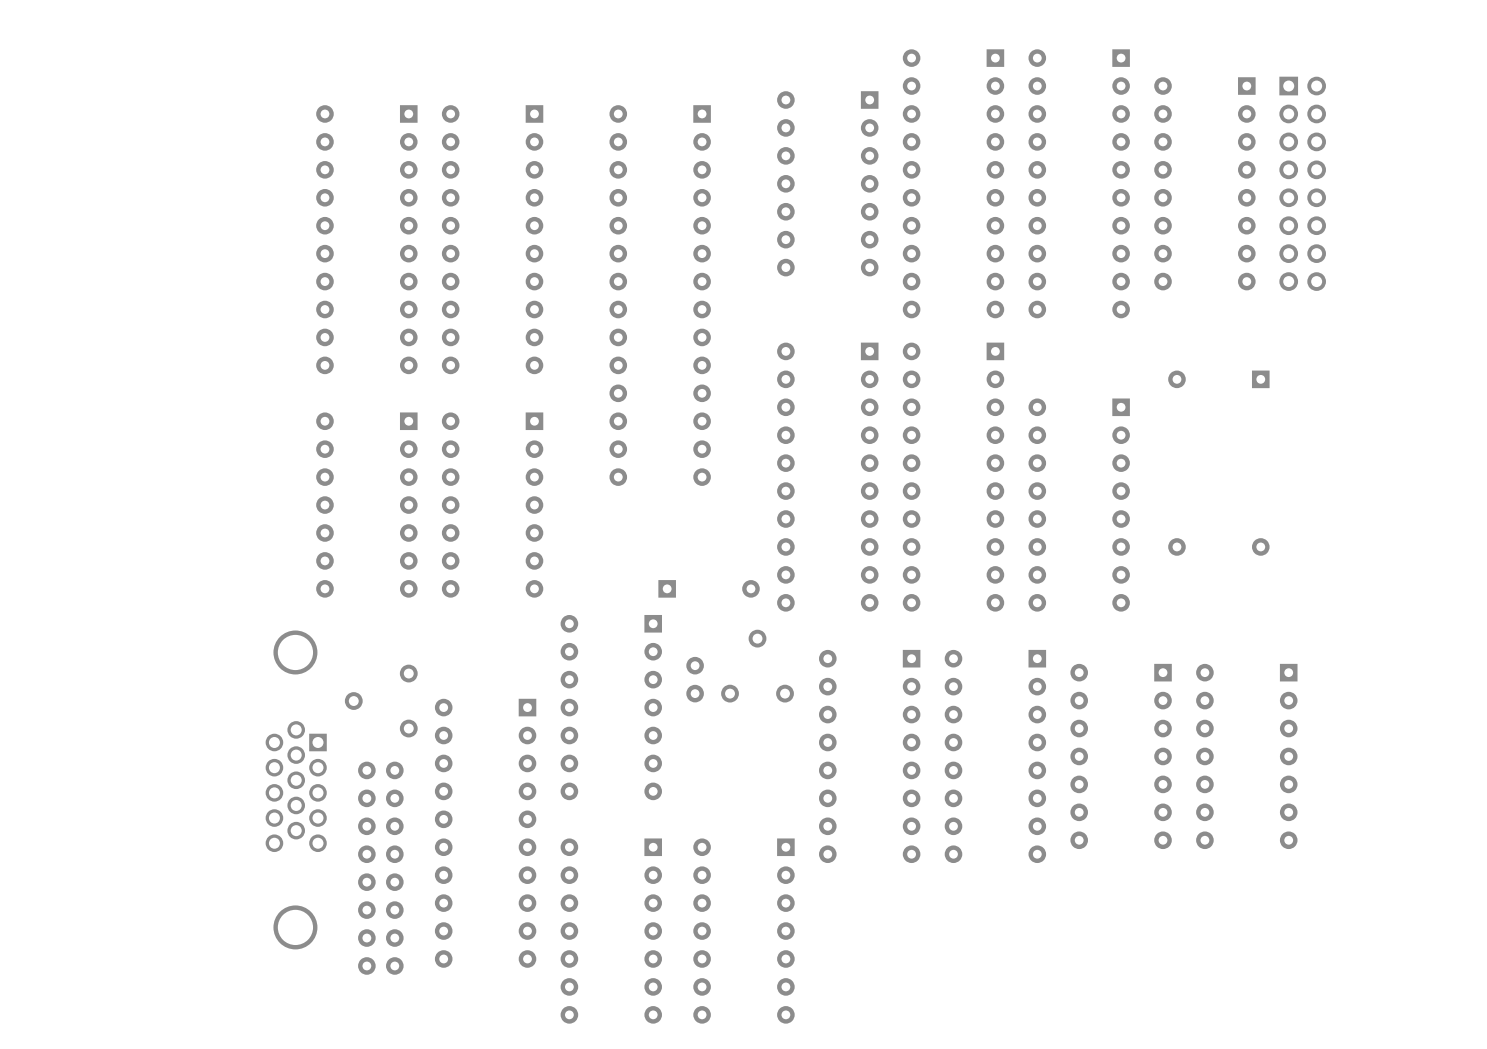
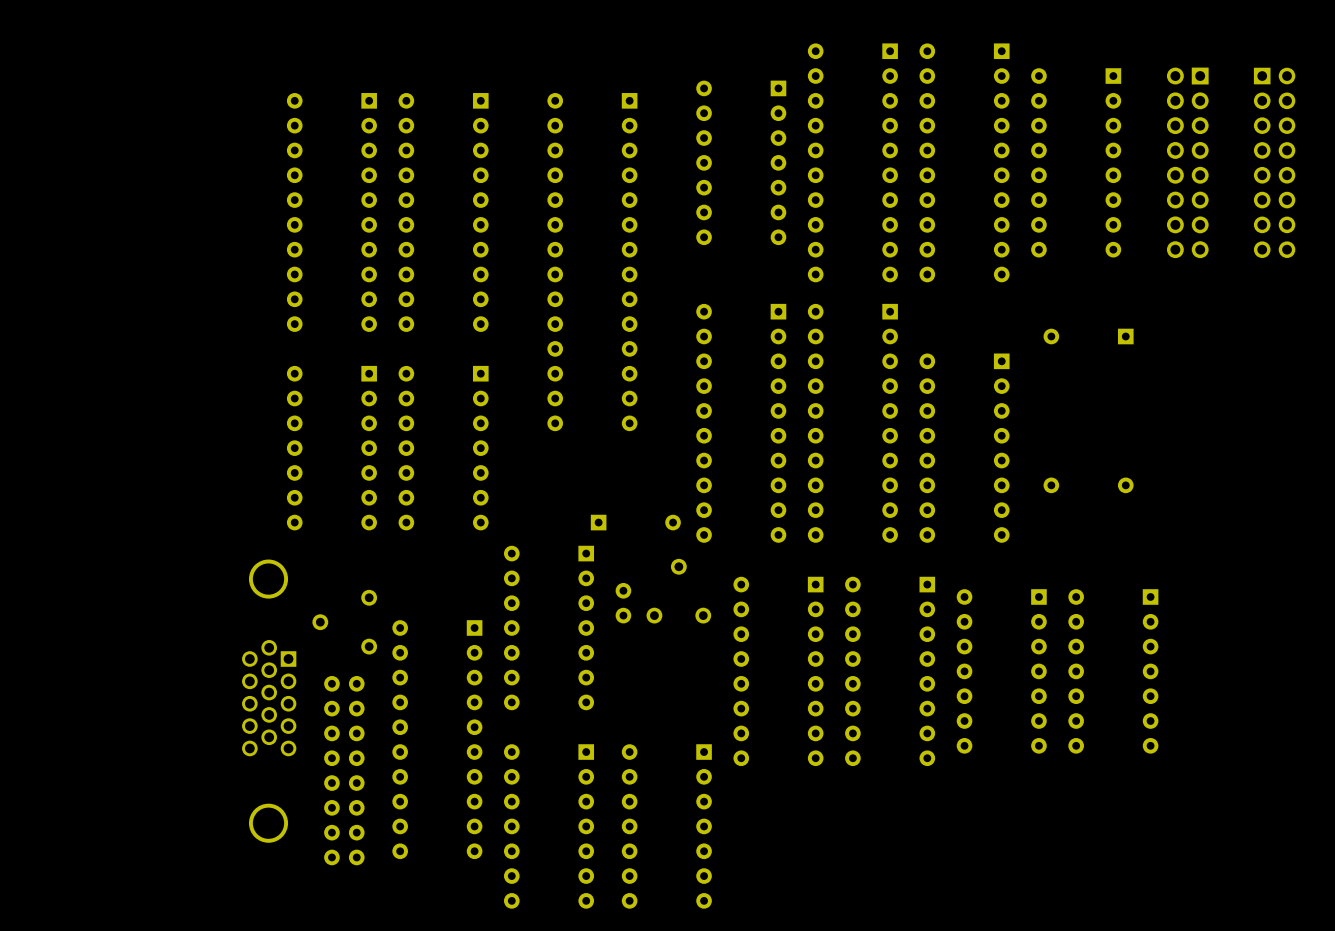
part position: (1302, 183) -> (1274, 162)
part: none -> (1187, 162)

